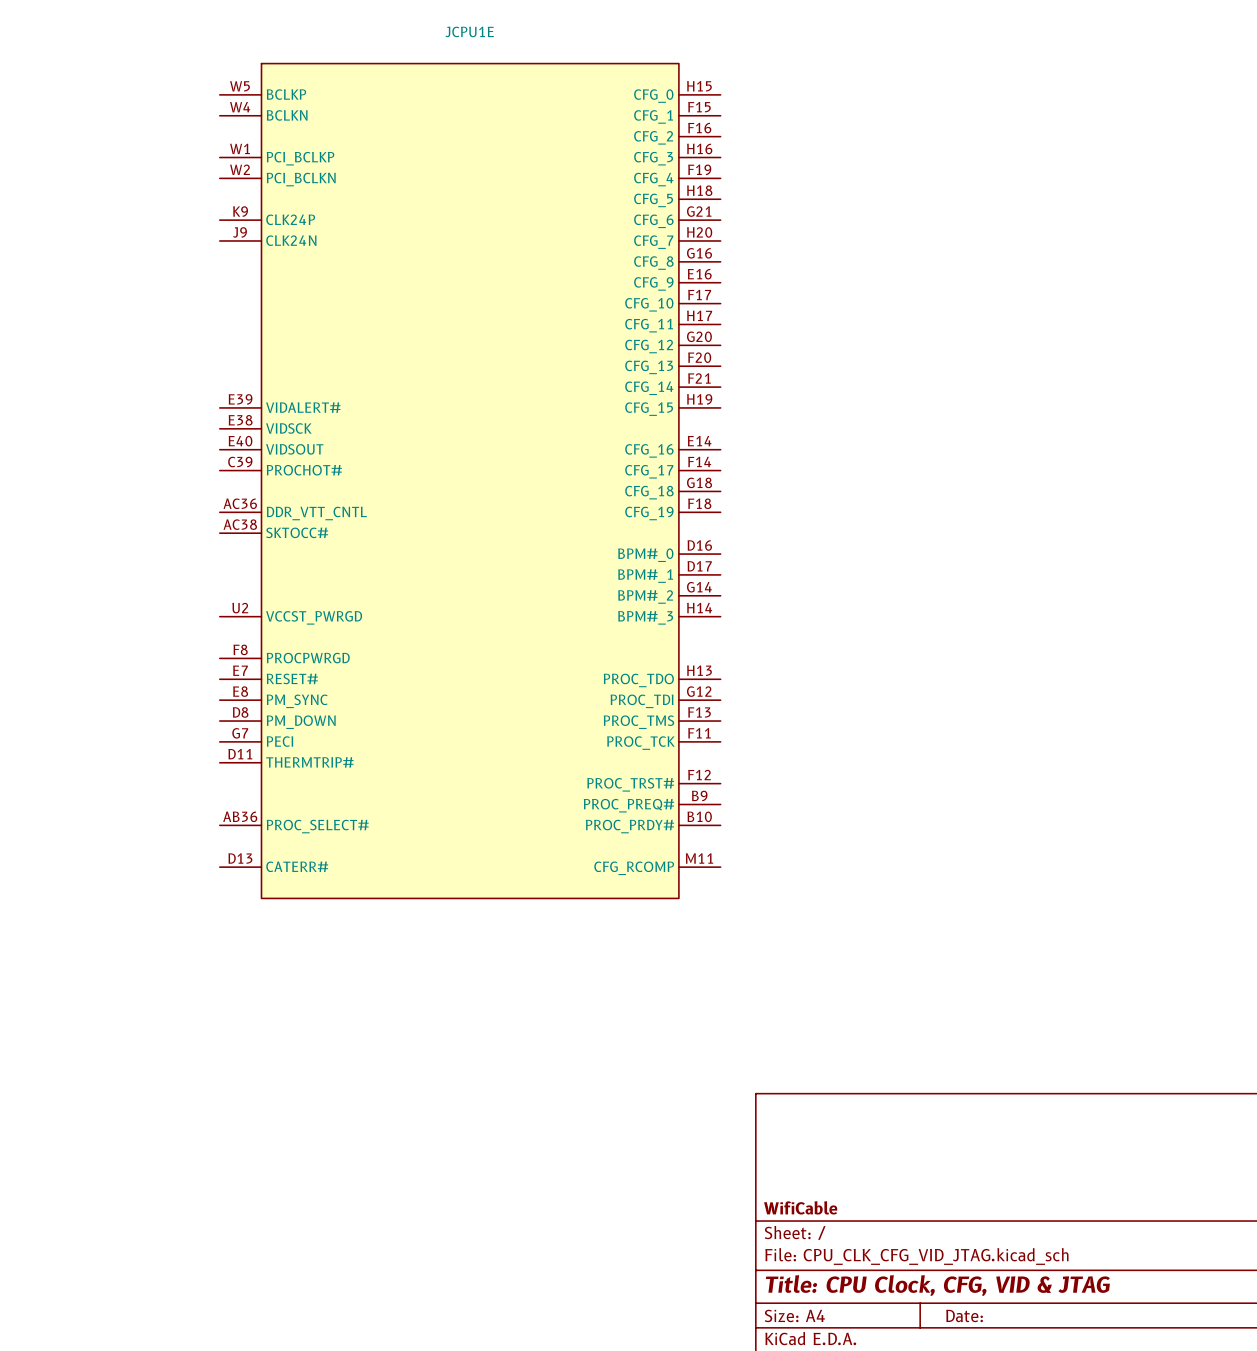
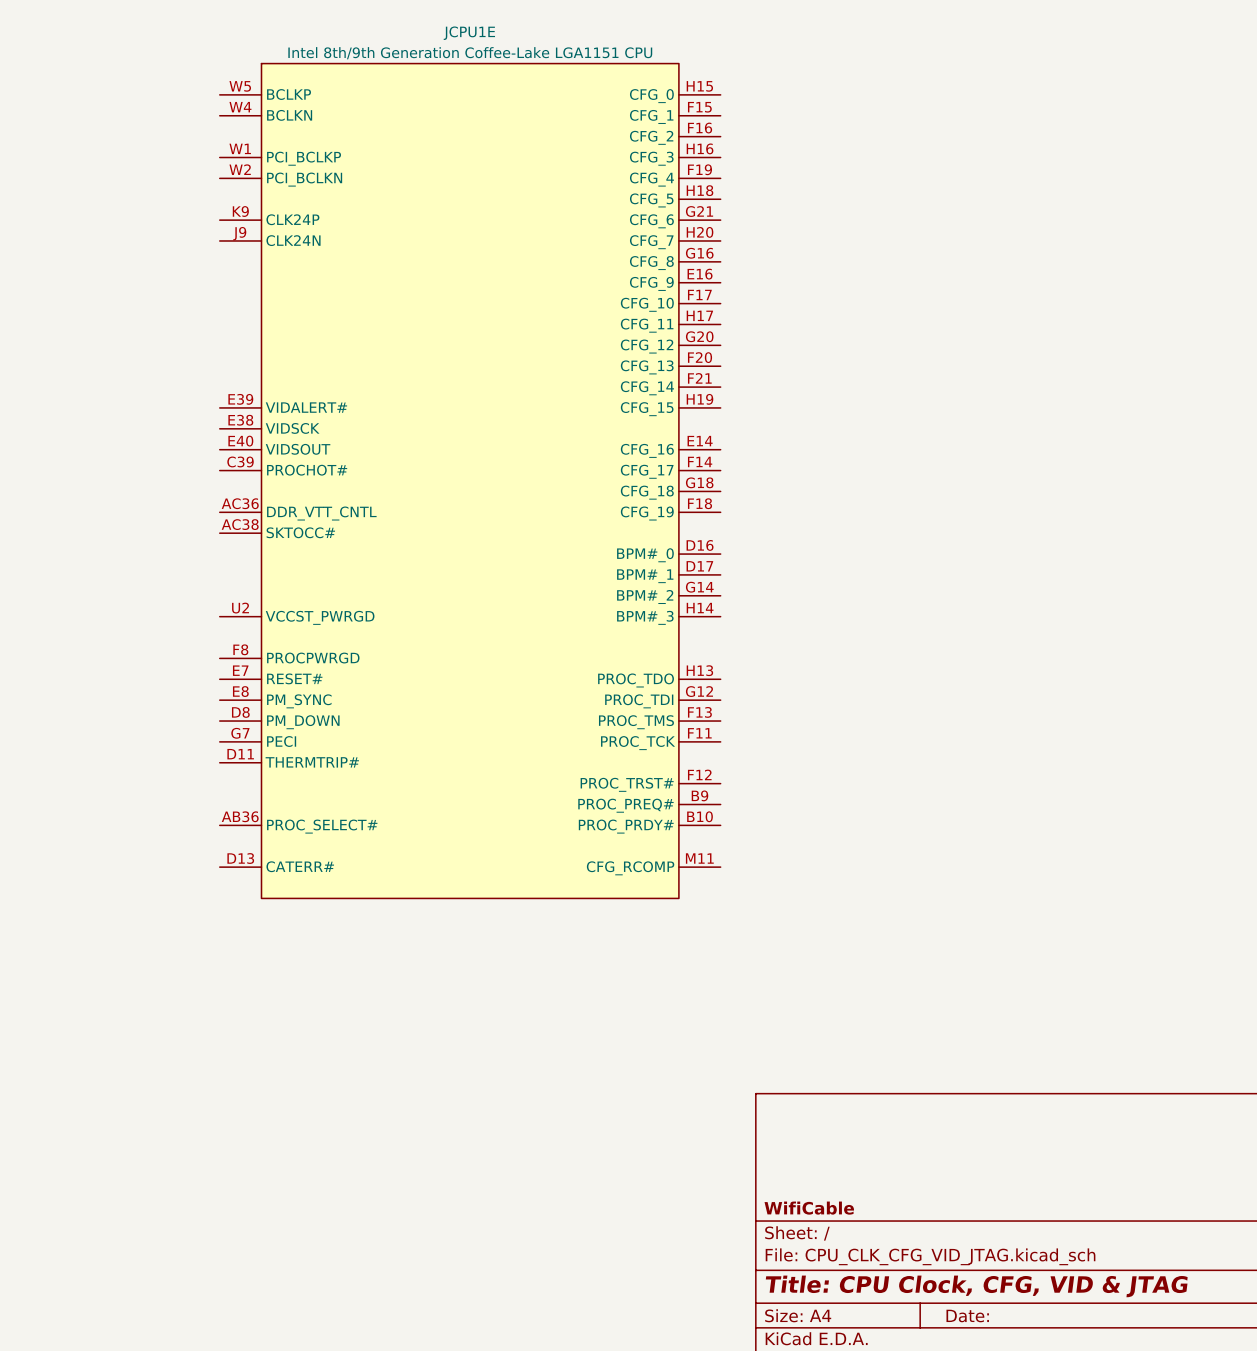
JCPU1E value: none -> Intel 8th/9th Generation Coffee-Lake LGA1151 CPU (470, 53)

